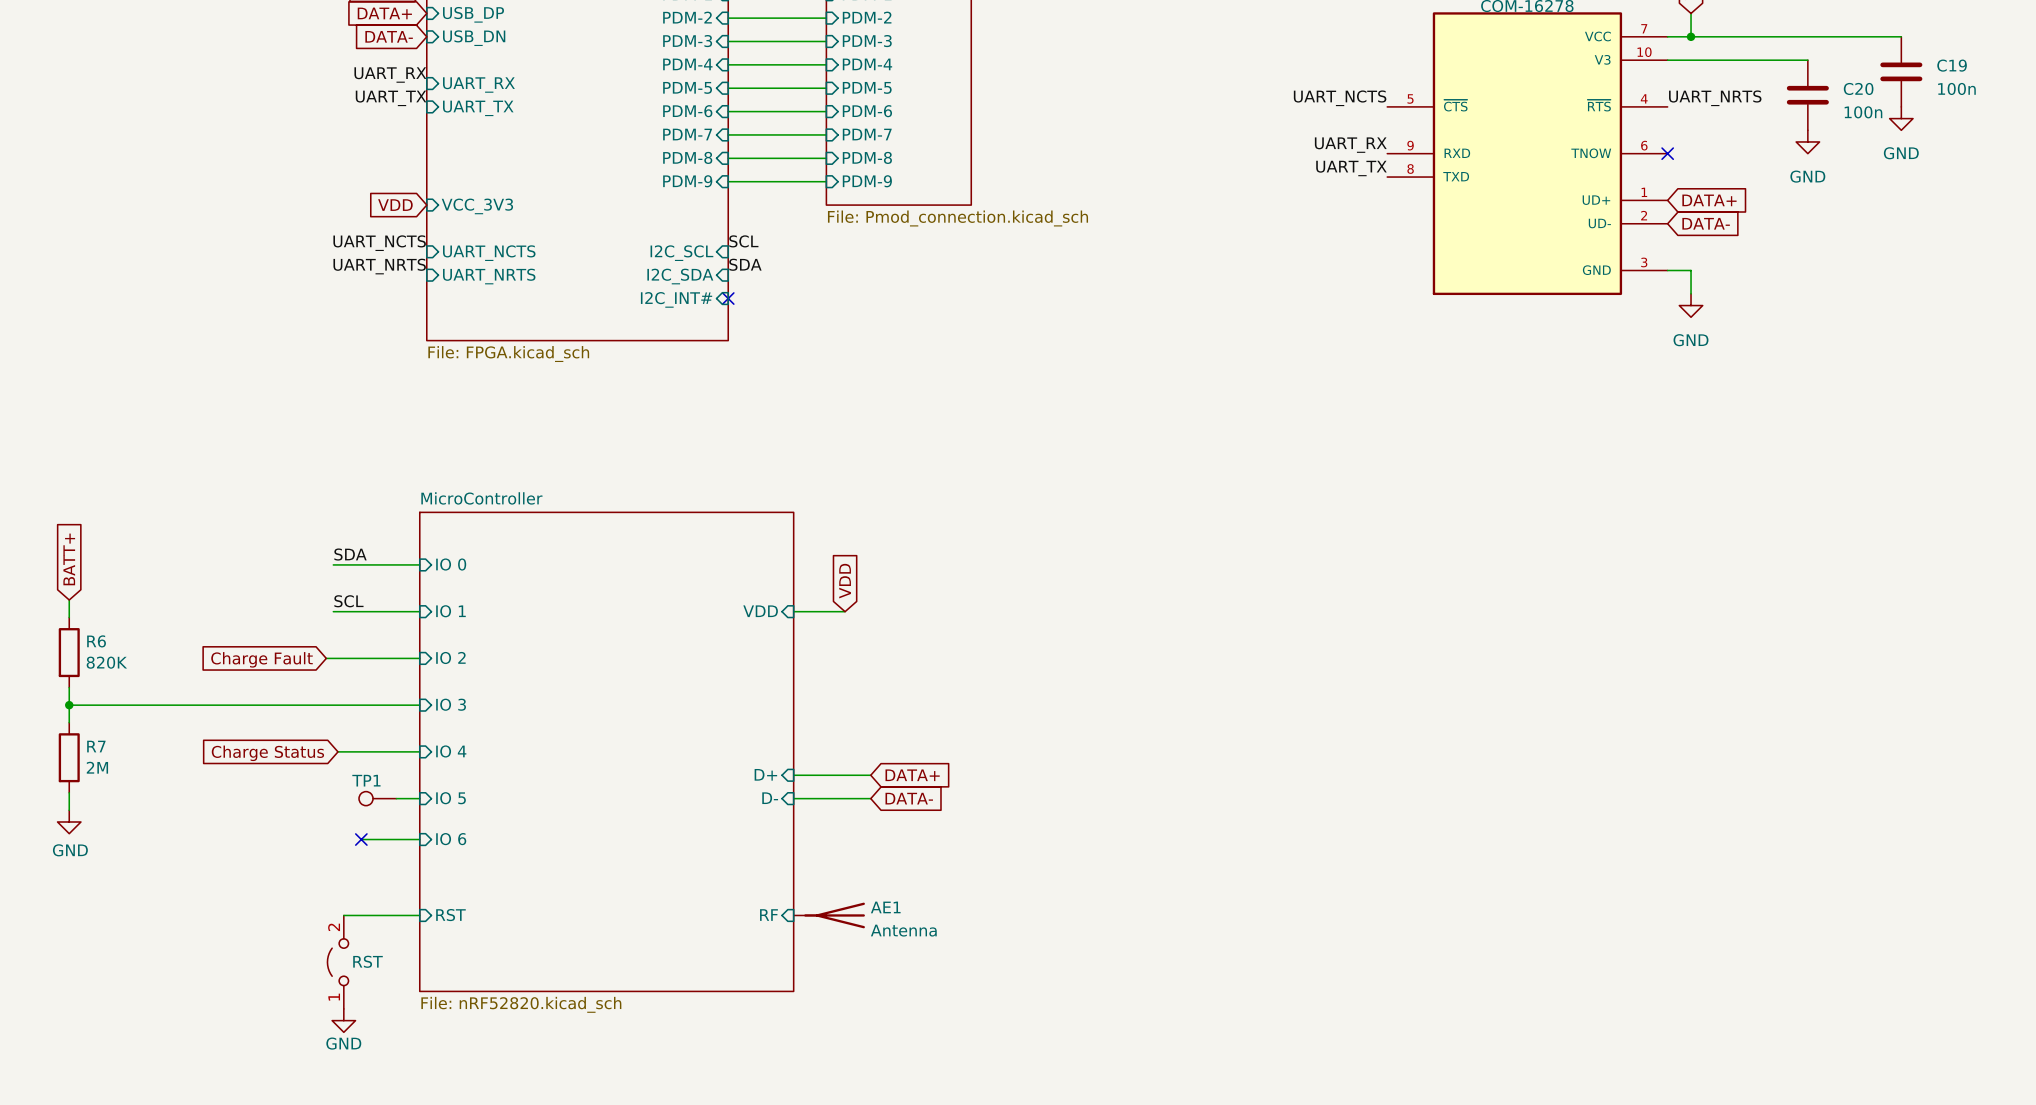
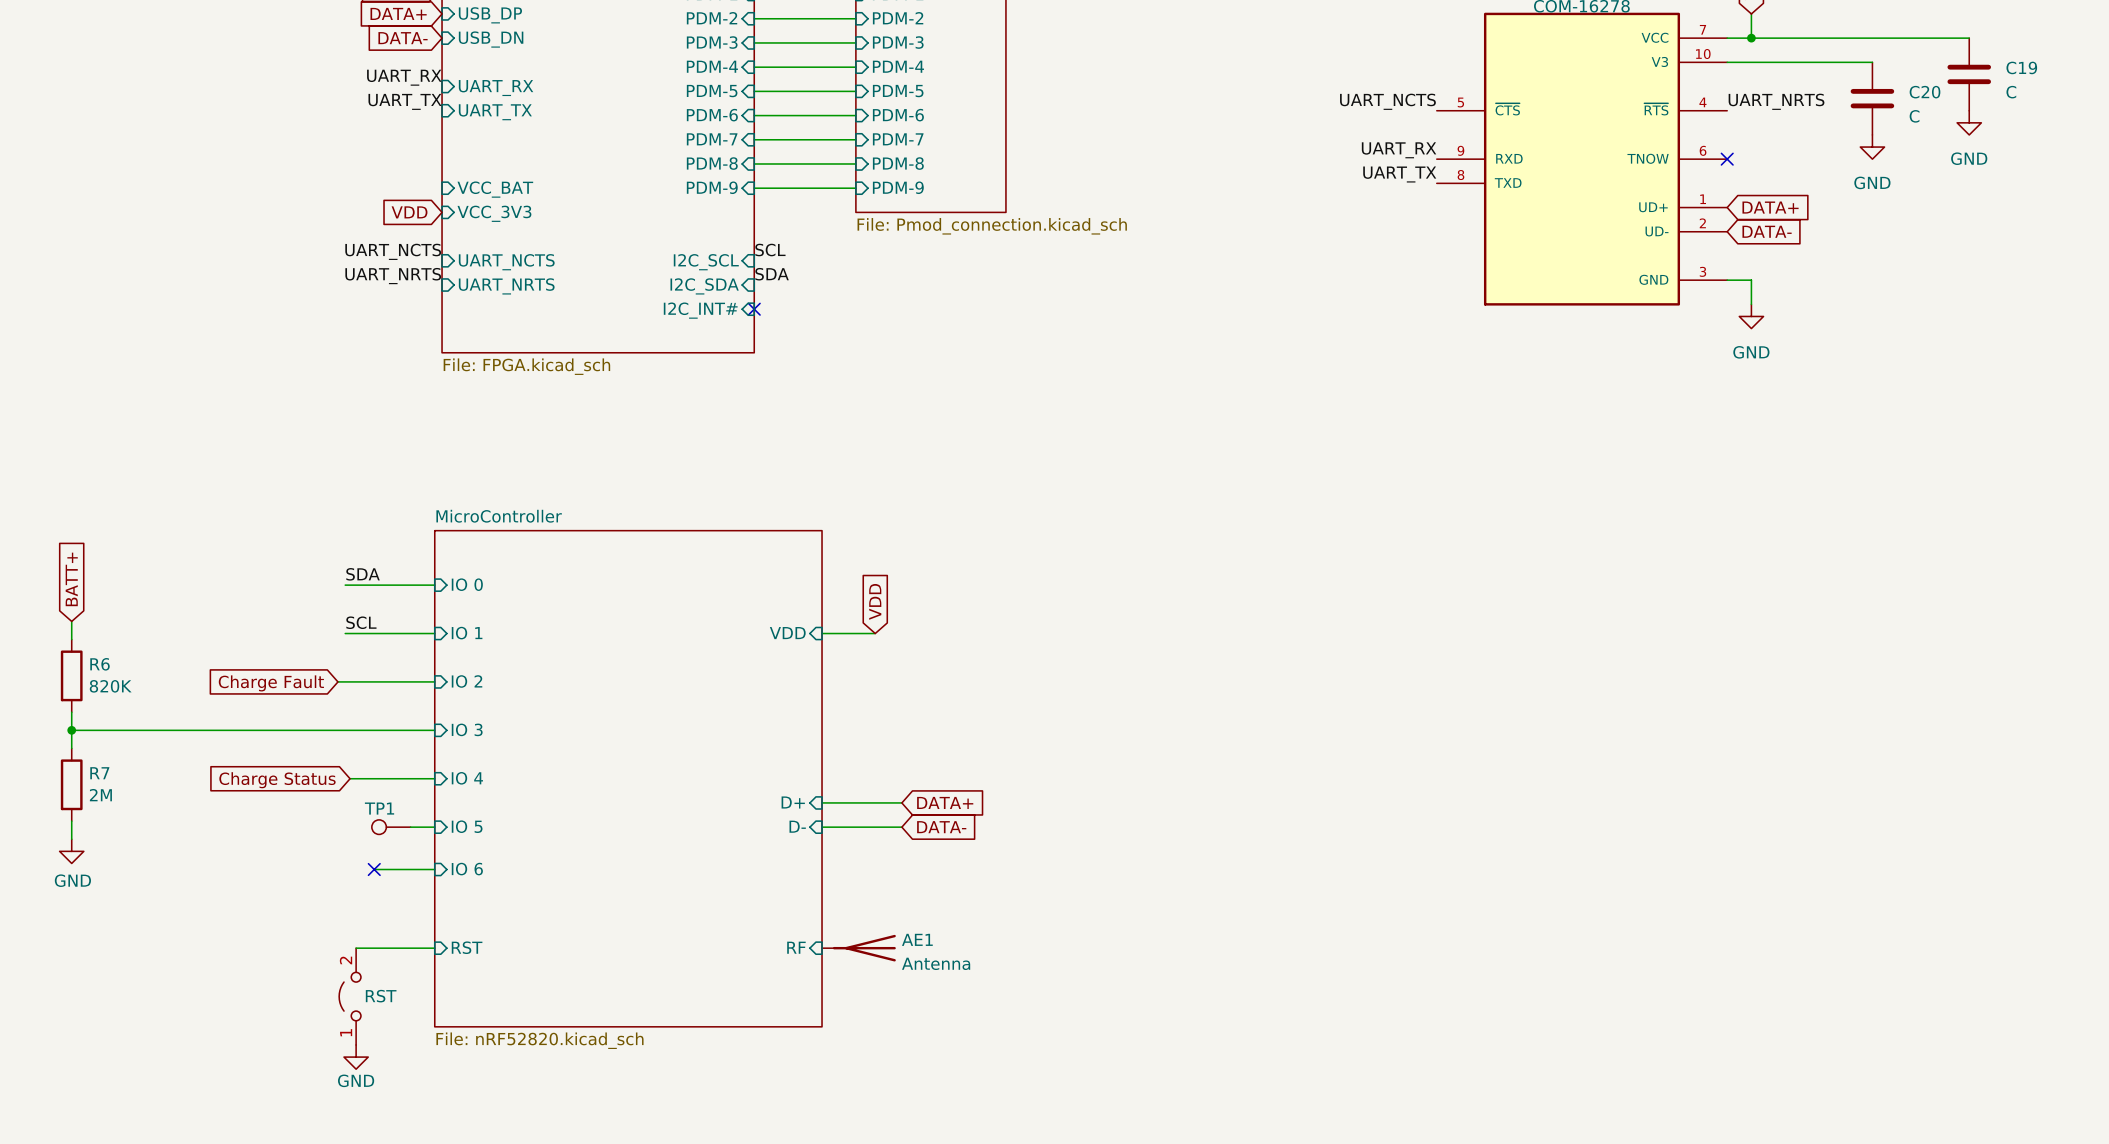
C19 value: 100n (1956, 88) -> C (2011, 92)
C20 value: 100n (1863, 112) -> C (1914, 116)
sheet pin: none -> VCC_BAT (495, 189)

